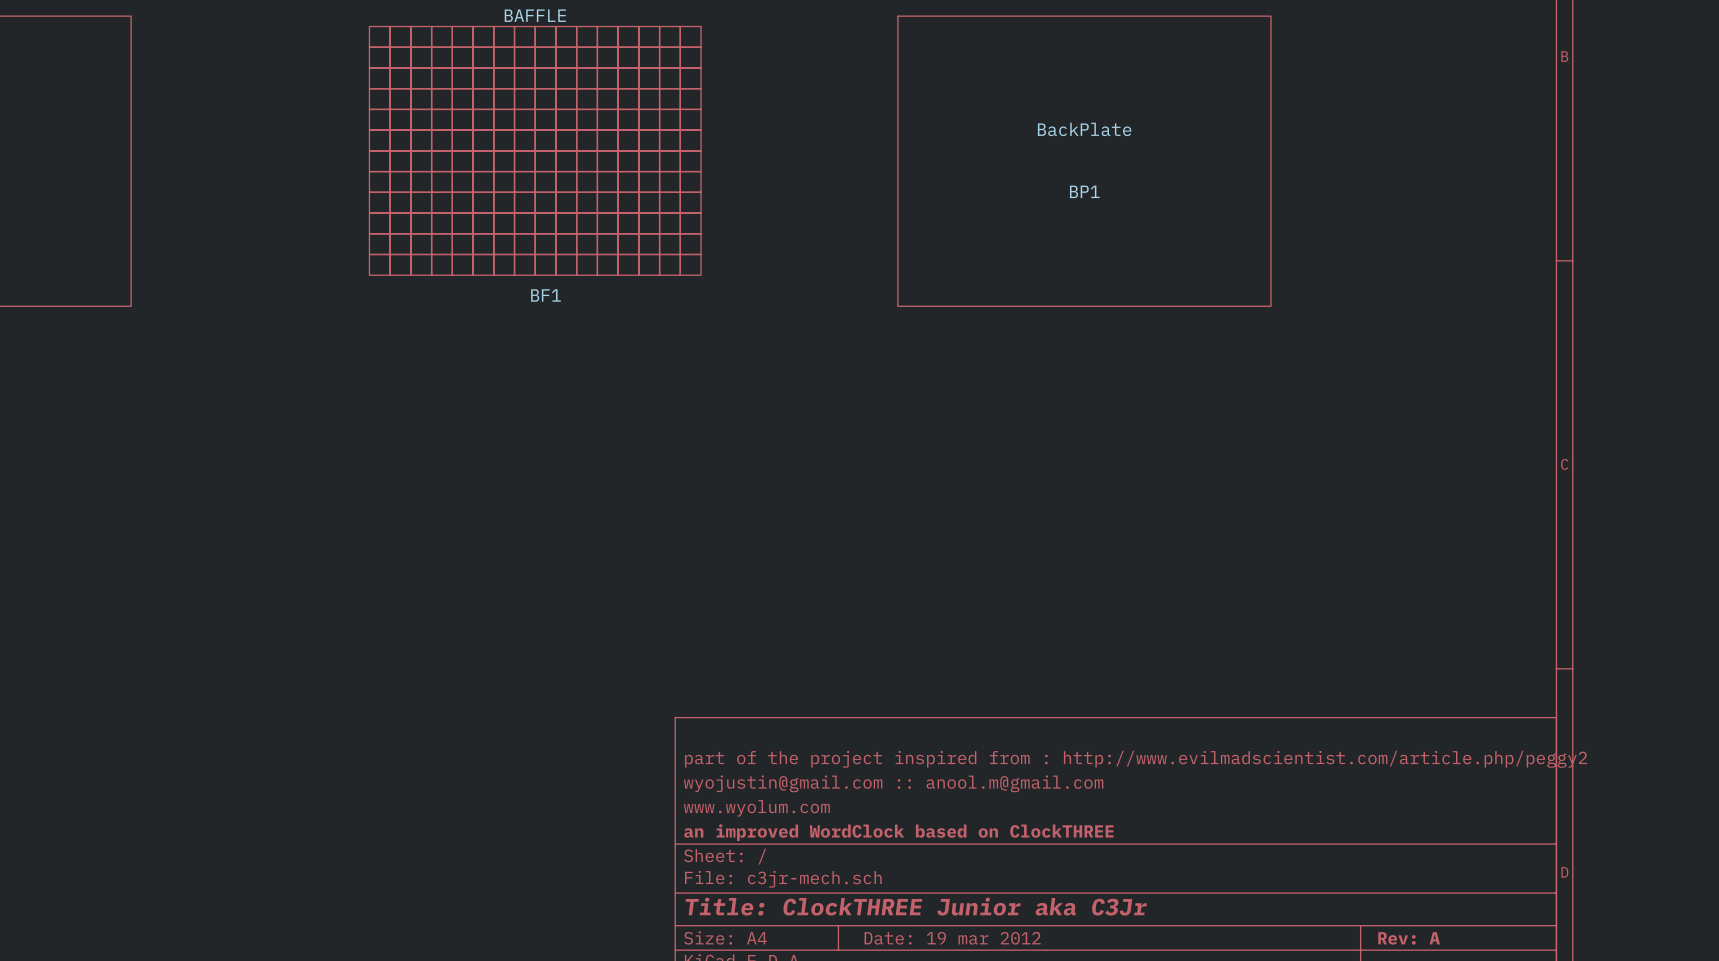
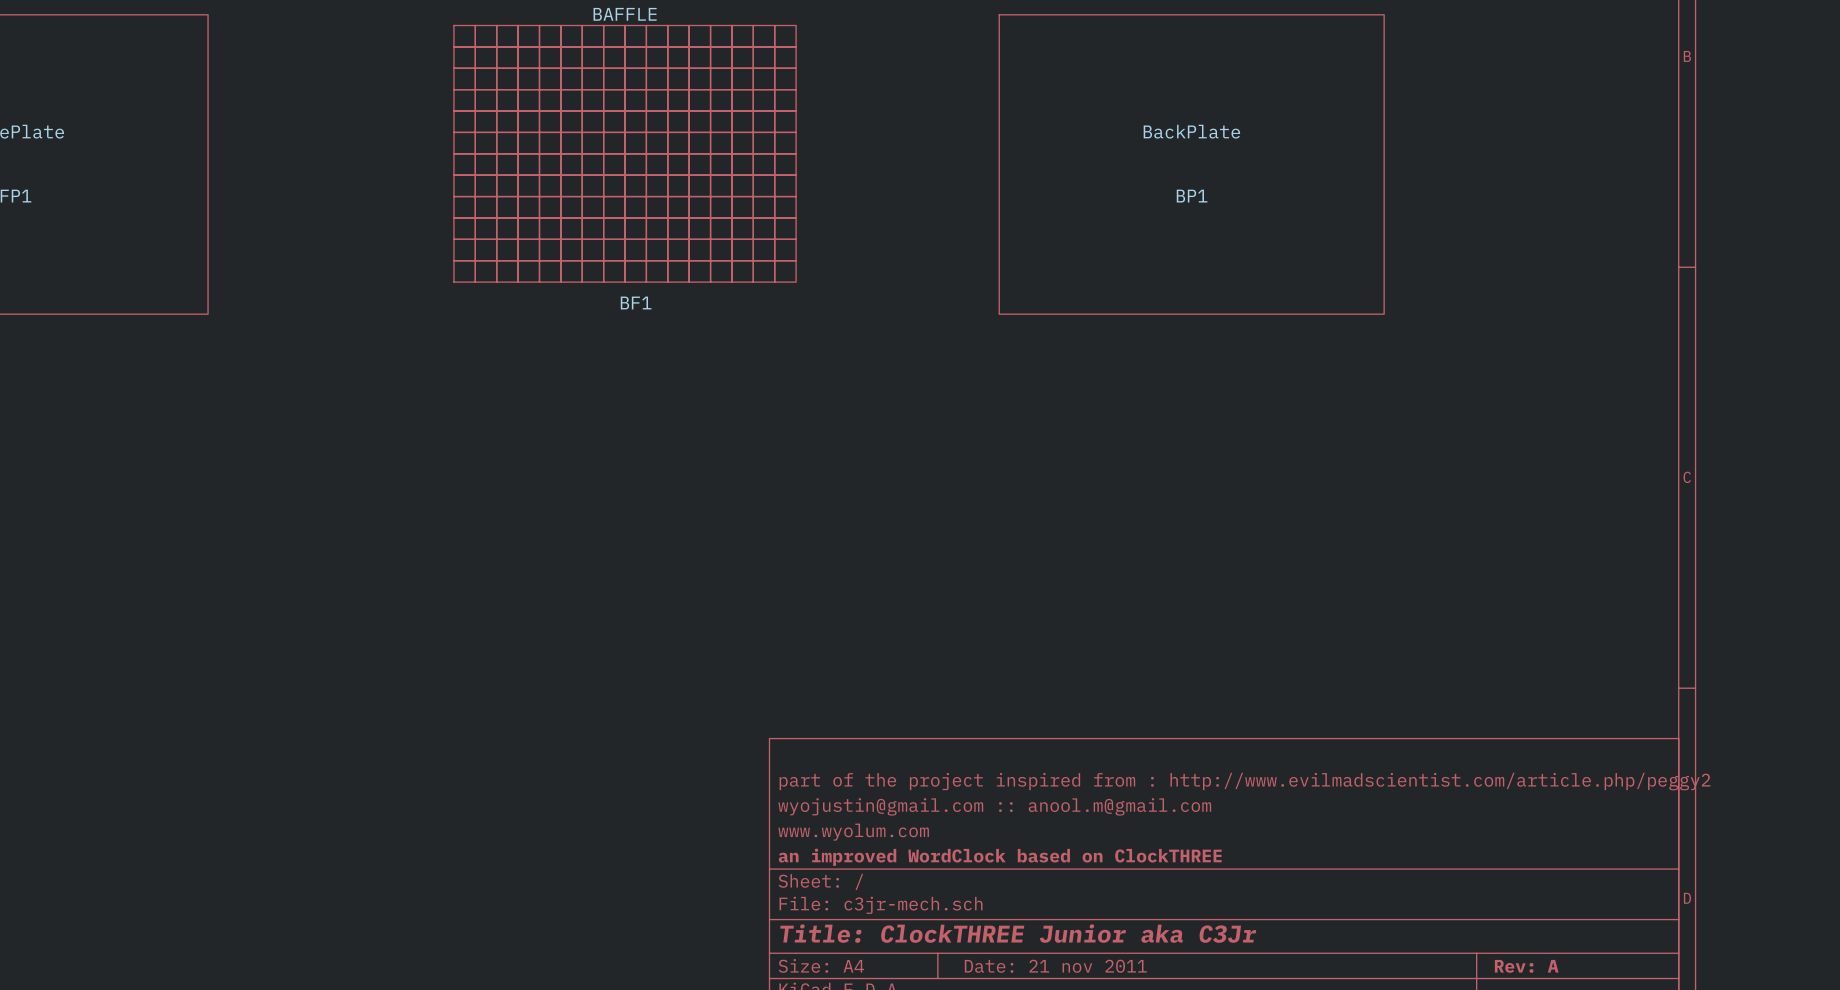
title block: Date: 19 mar 2012 (952, 938) -> Date: 21 nov 2011 (1055, 966)

